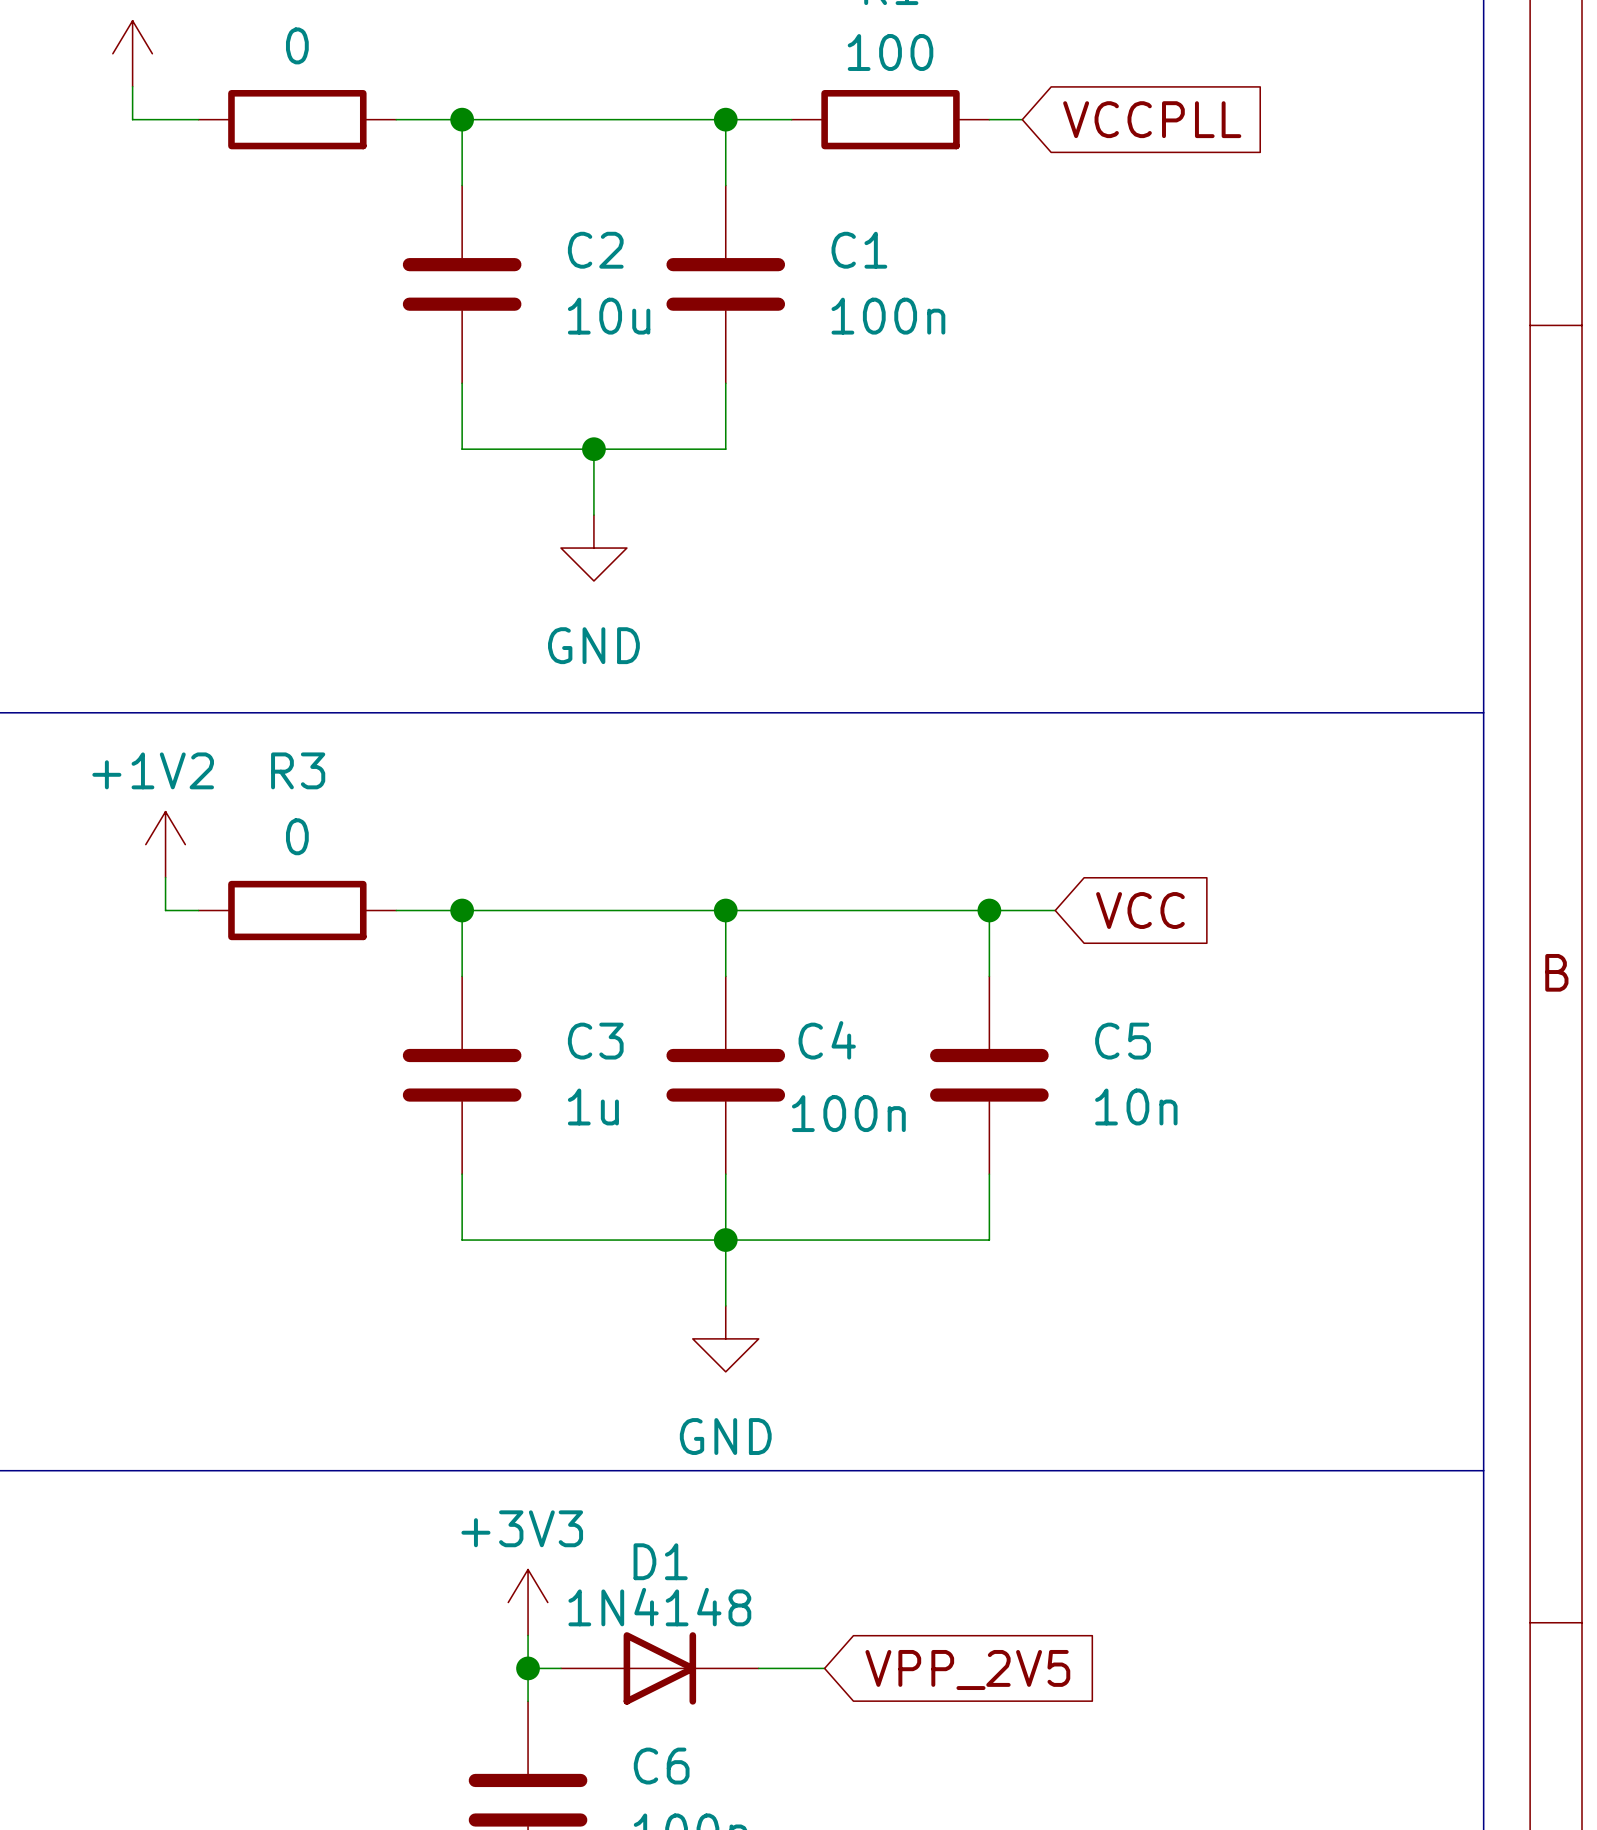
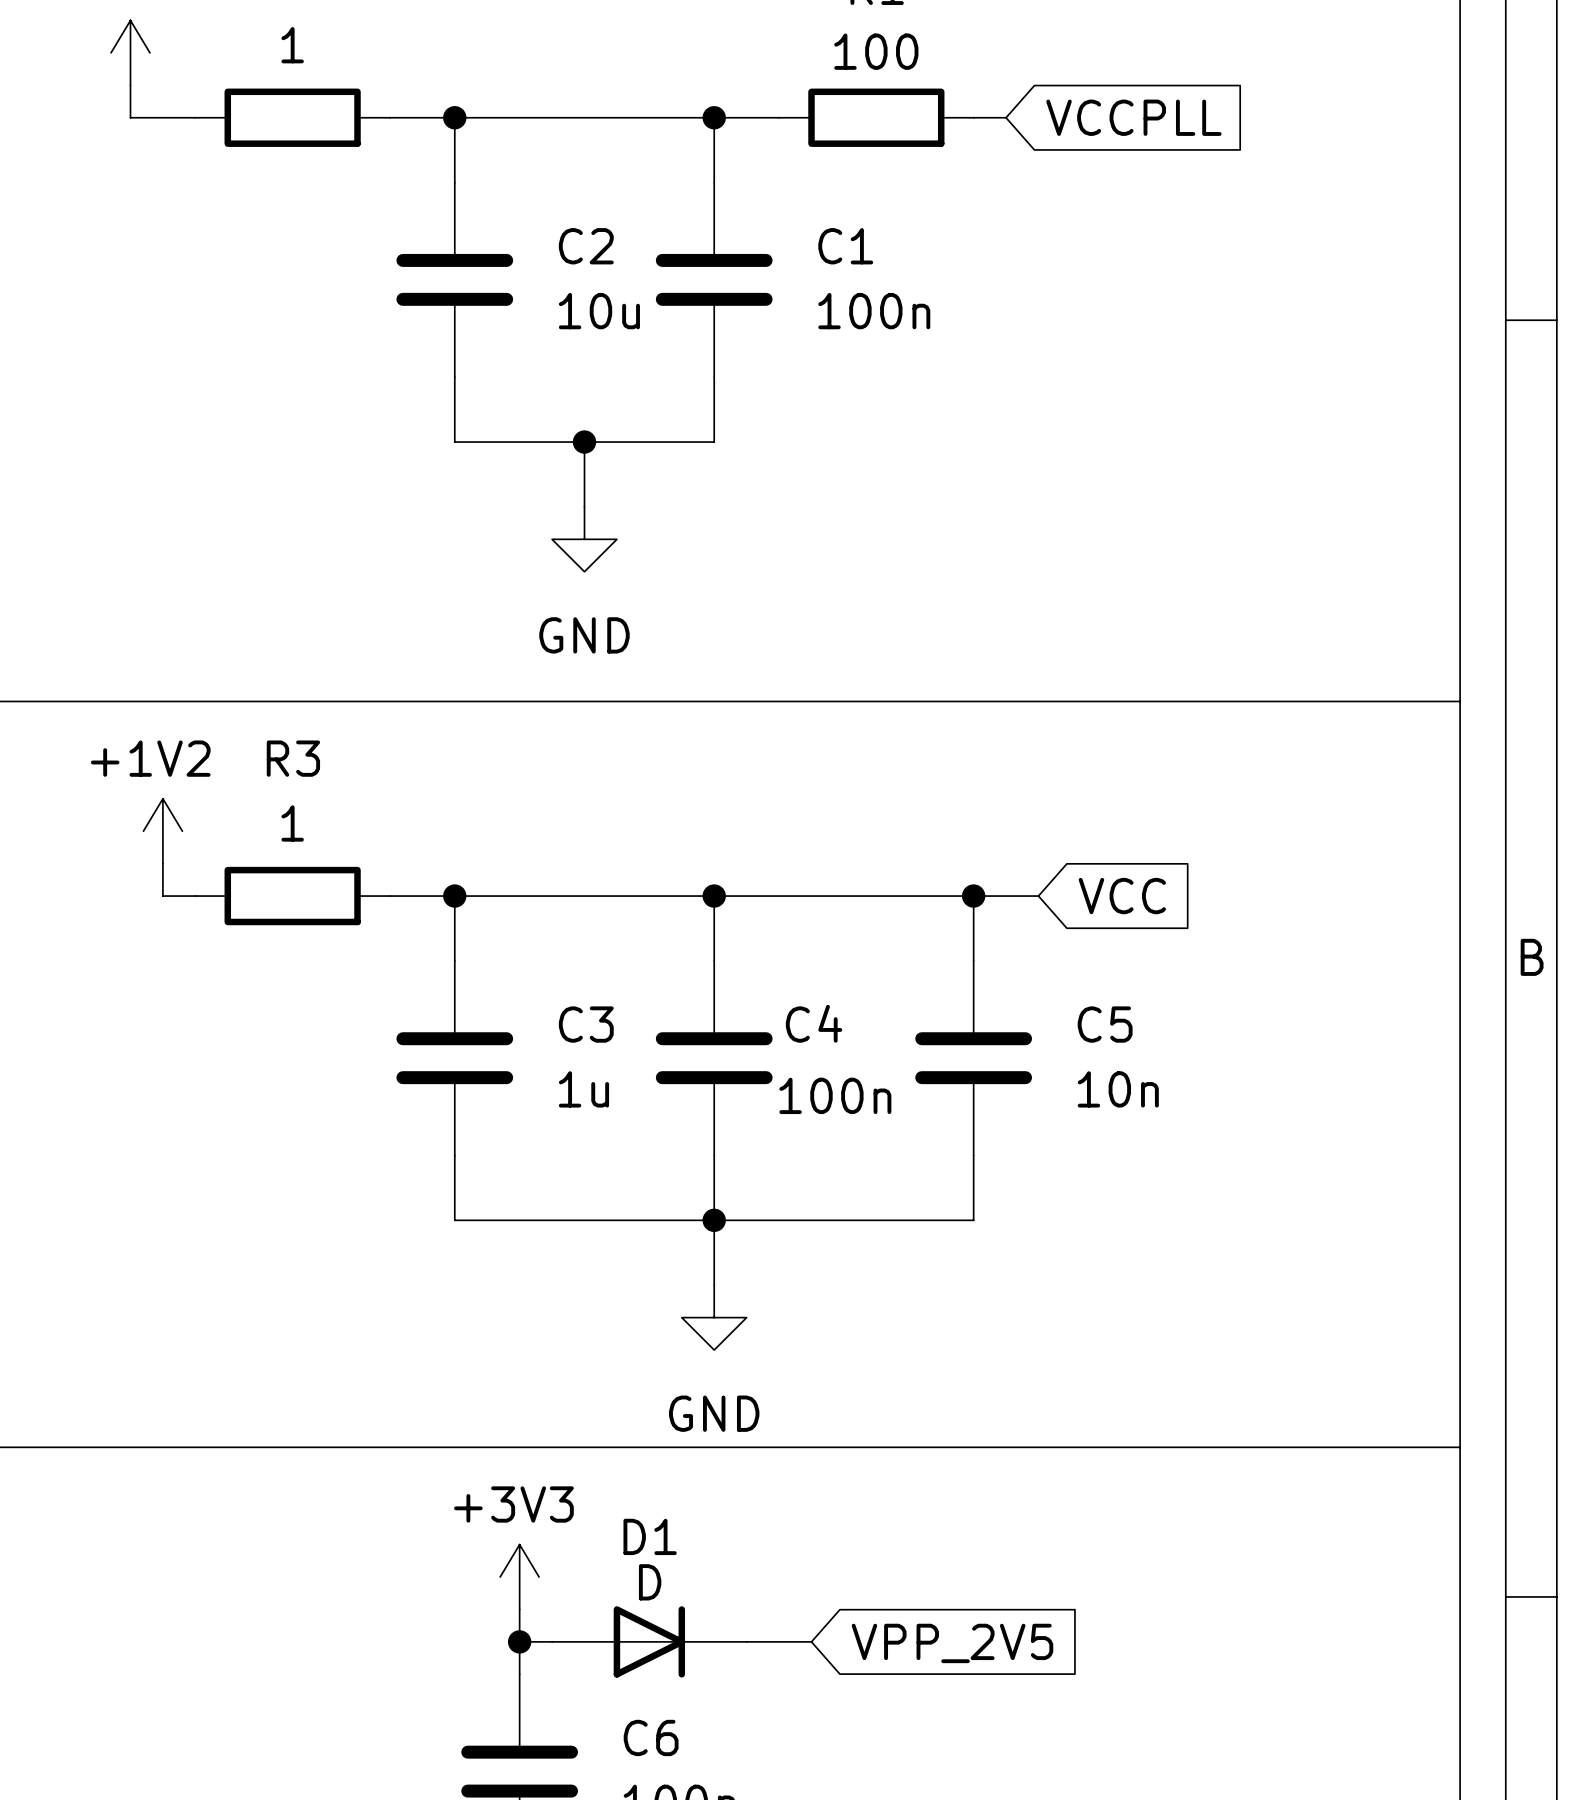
part value: 0 (297, 45) -> 1 (292, 45)
R3 value: 0 (297, 836) -> 1 (292, 823)
D1 value: 1N4148 (659, 1607) -> D (650, 1582)

